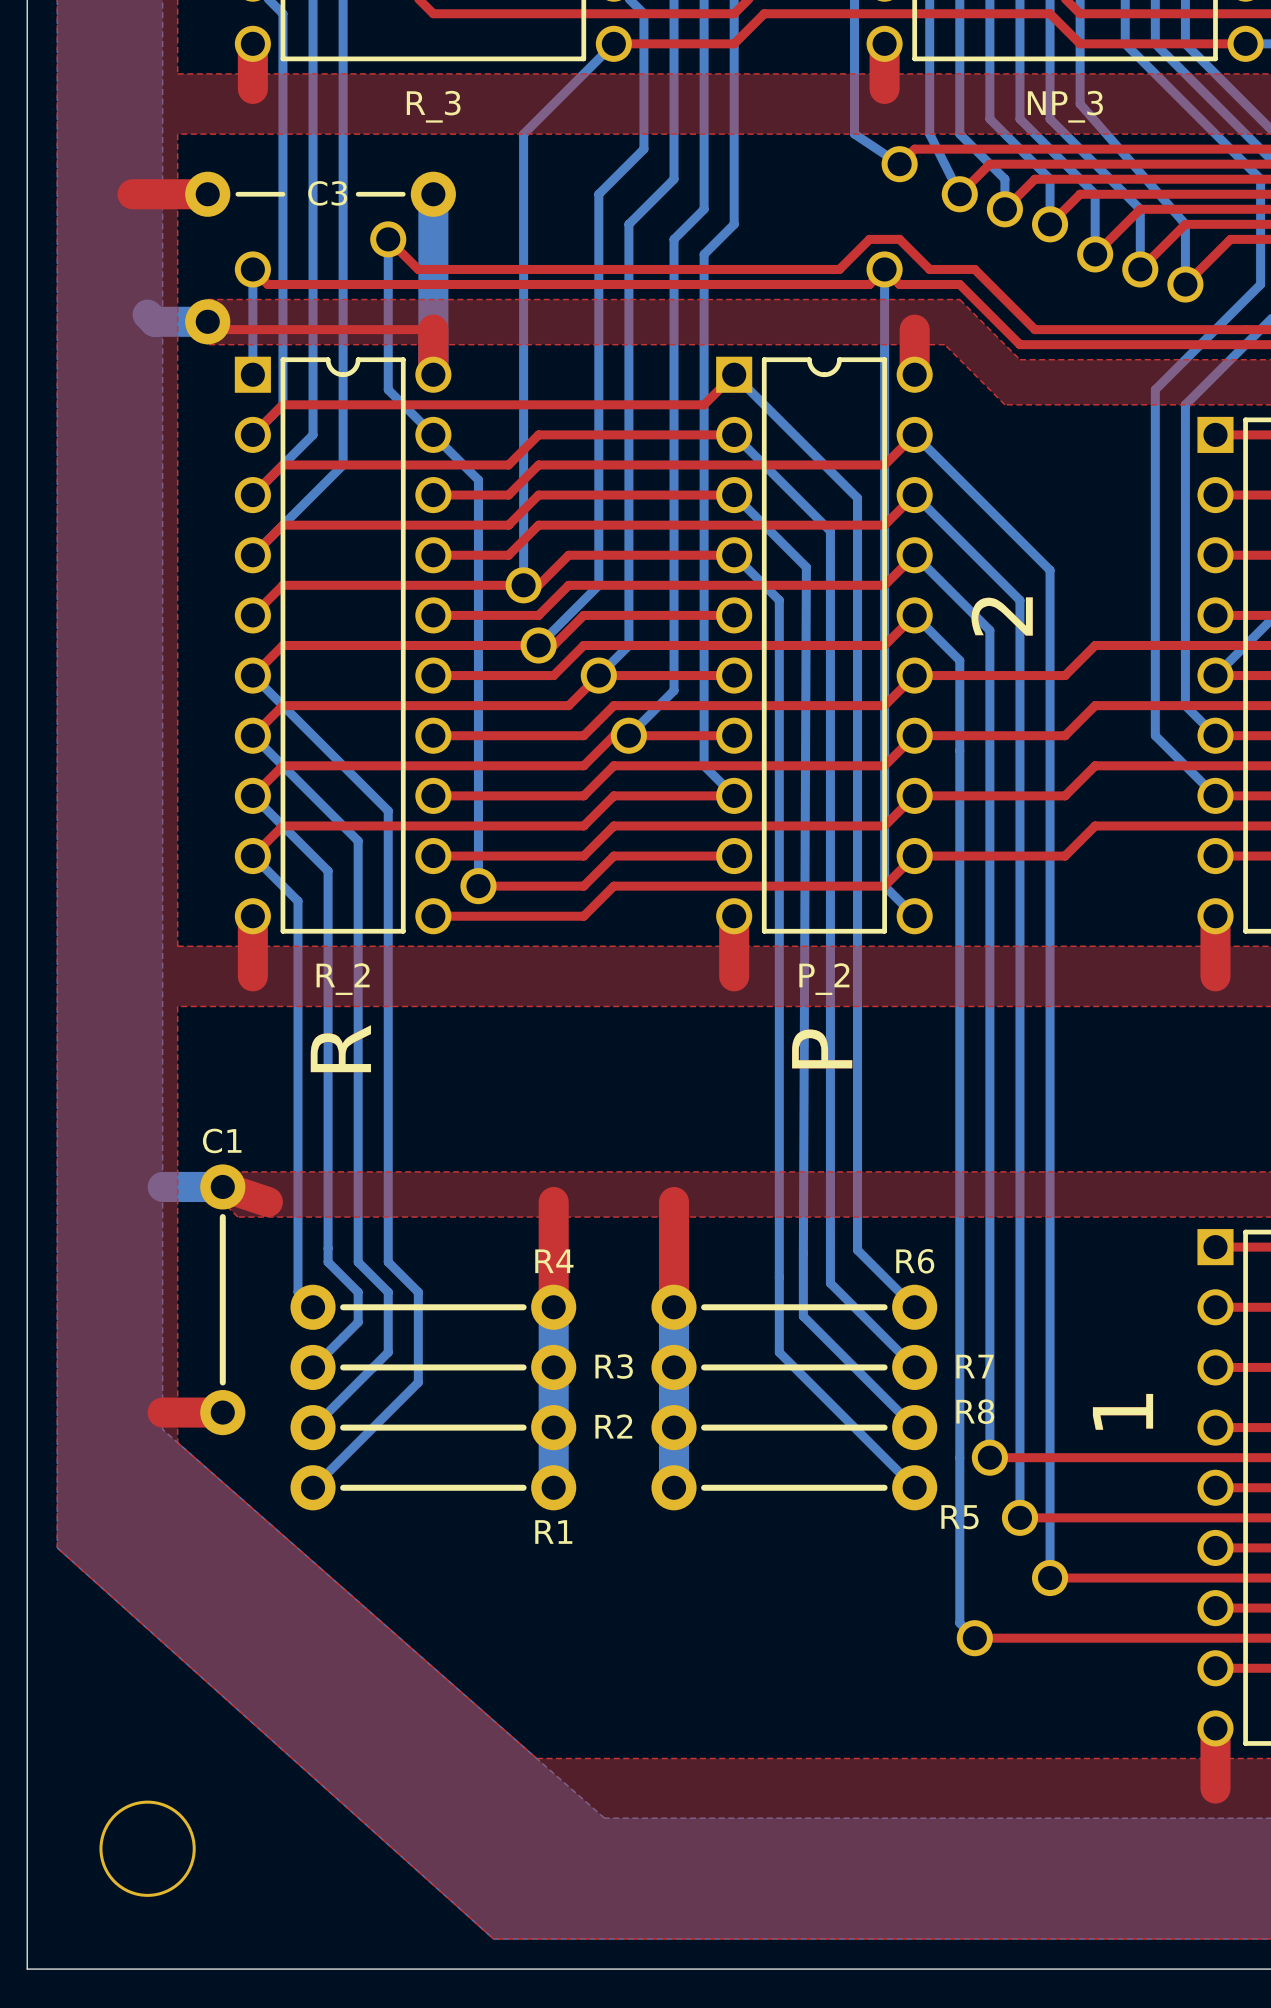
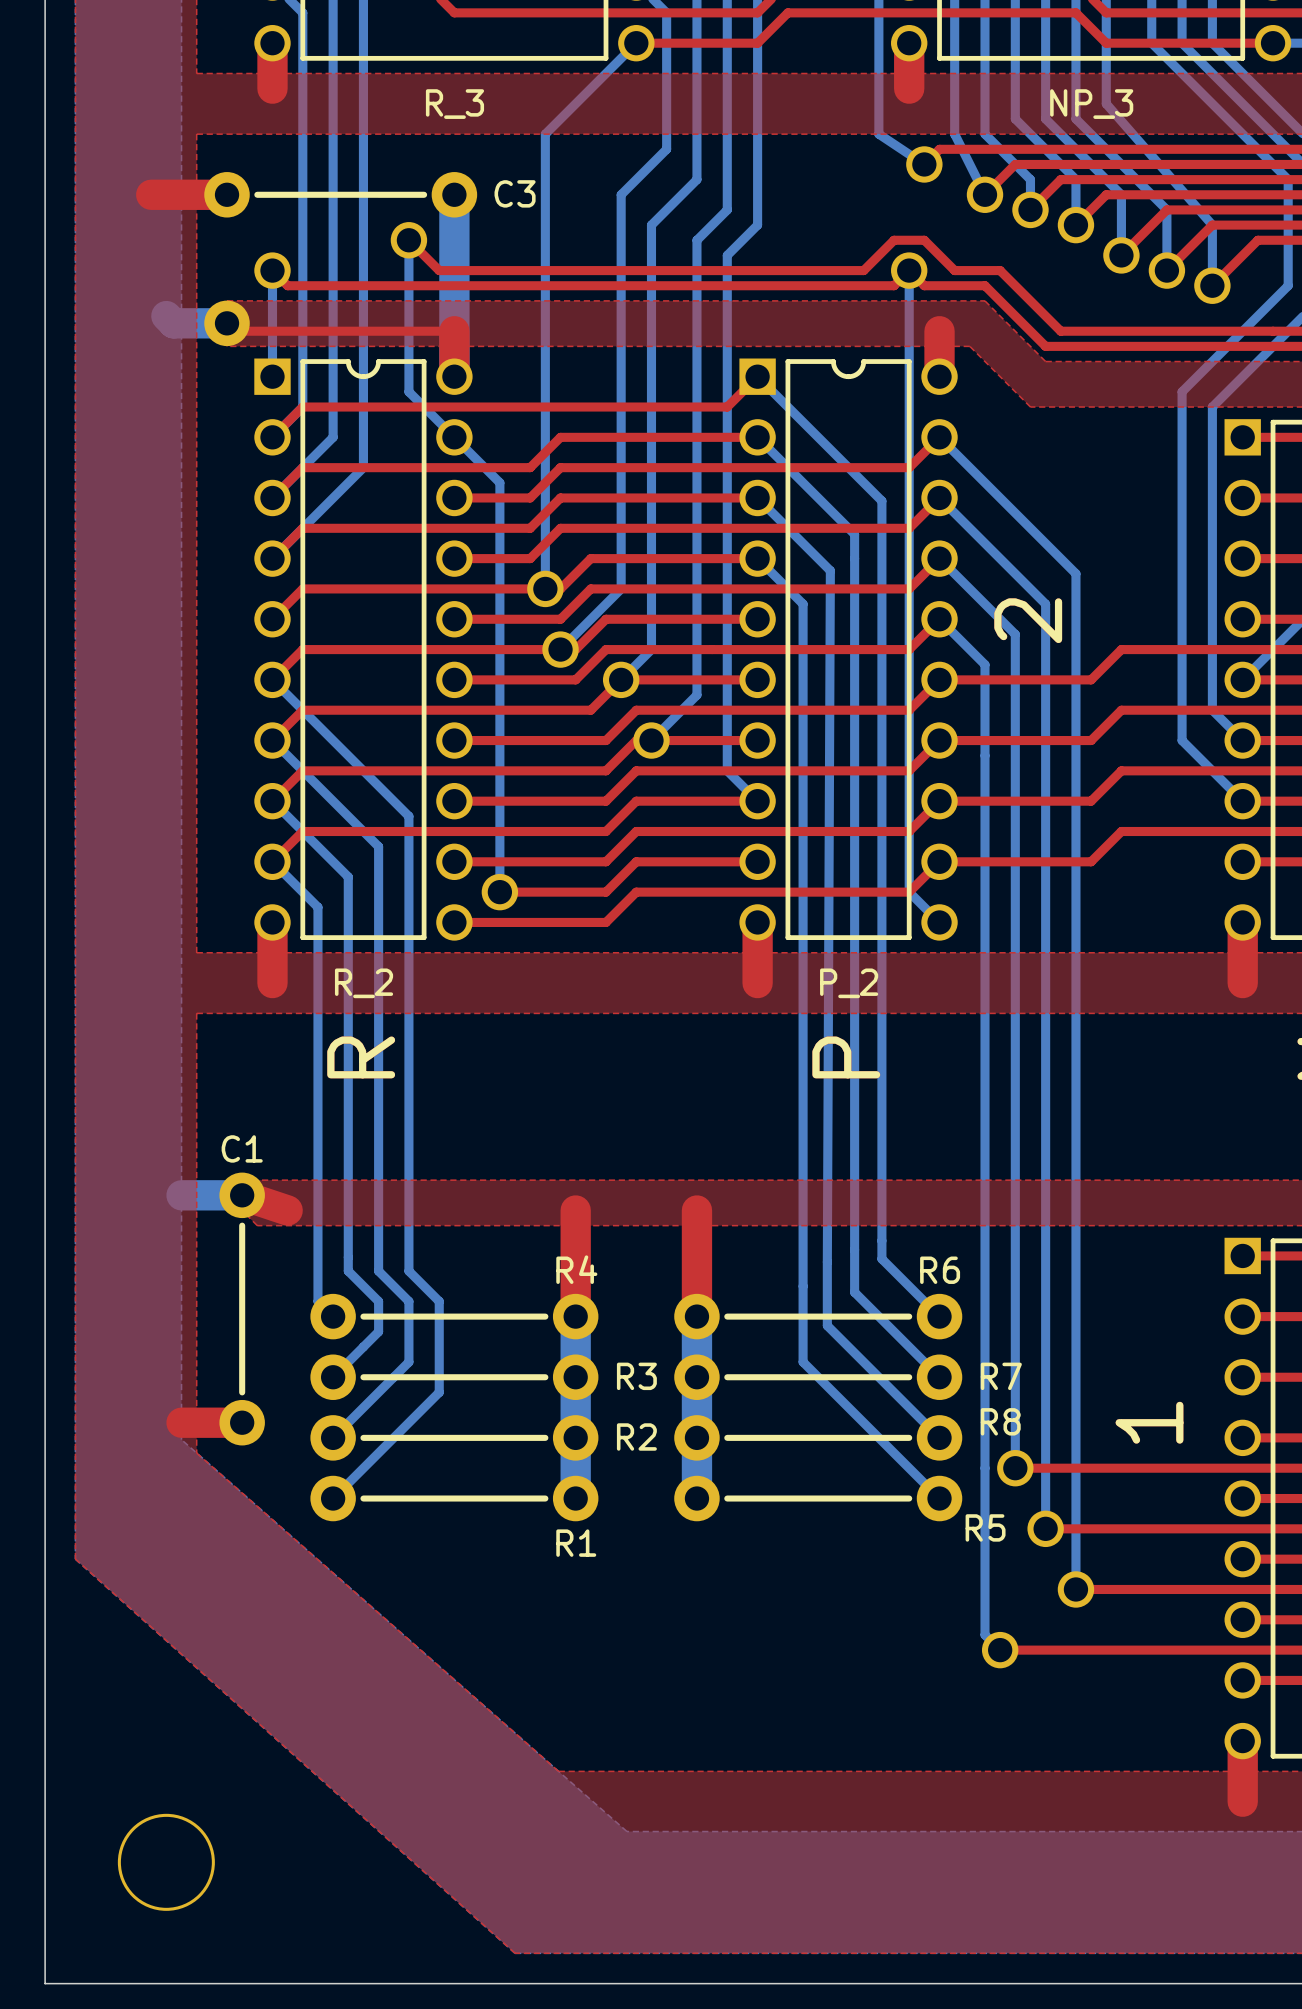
C3 name position: C3 (327, 193) -> C3 (515, 193)
line: none -> (257, 194) (424, 194)

